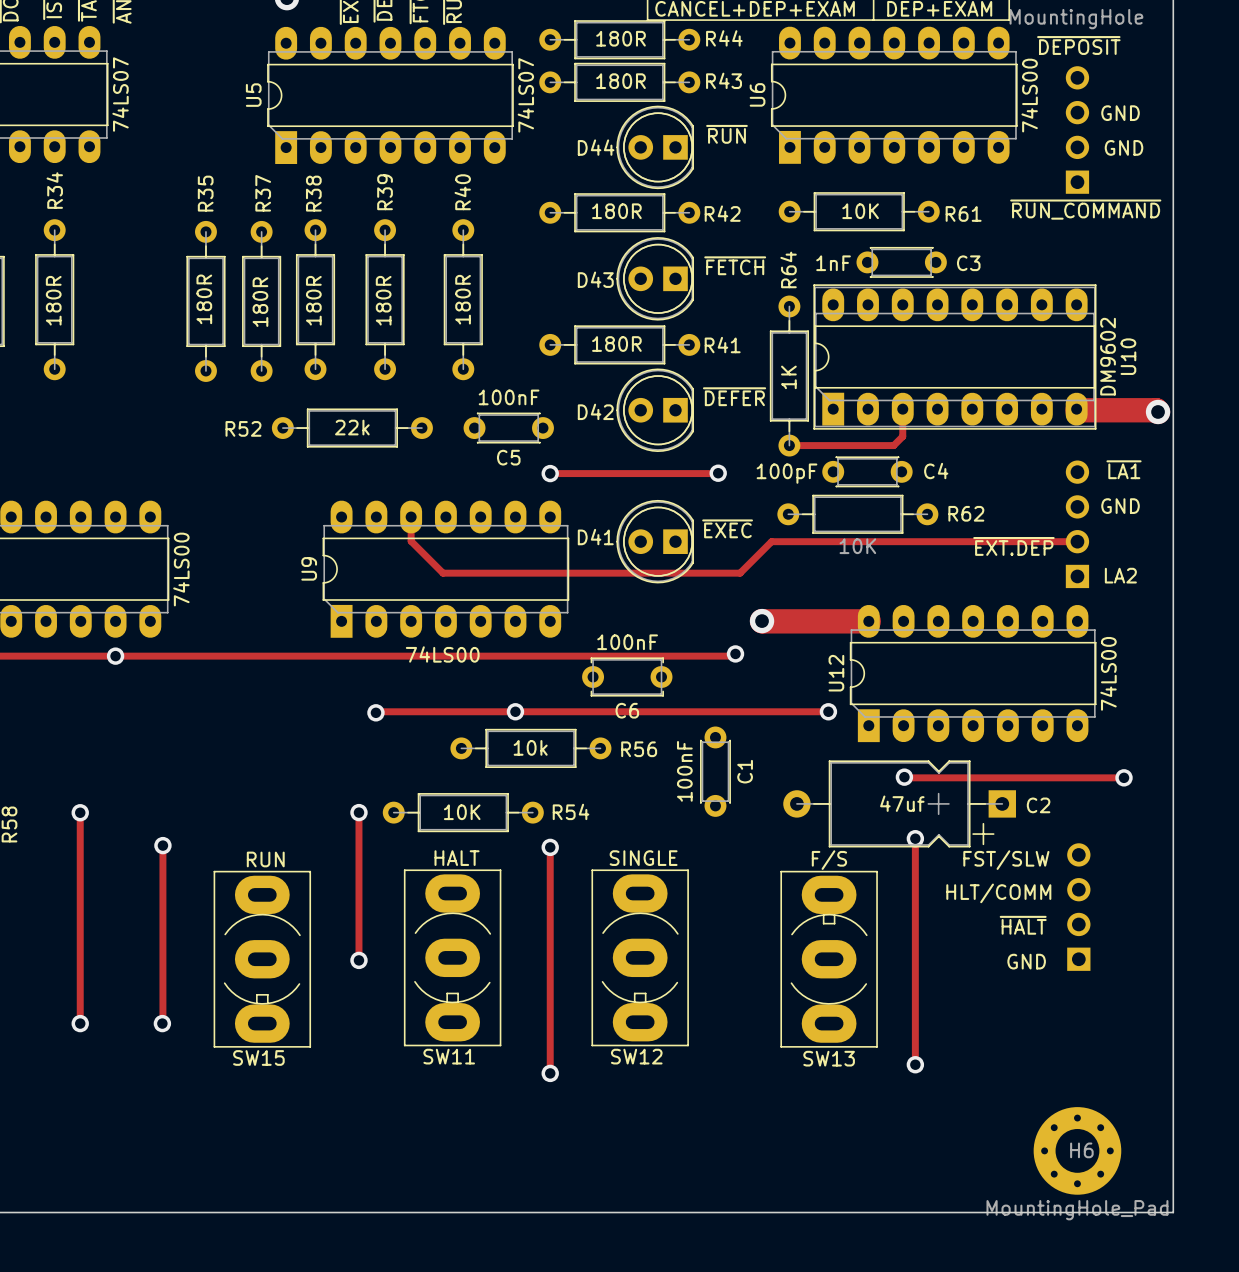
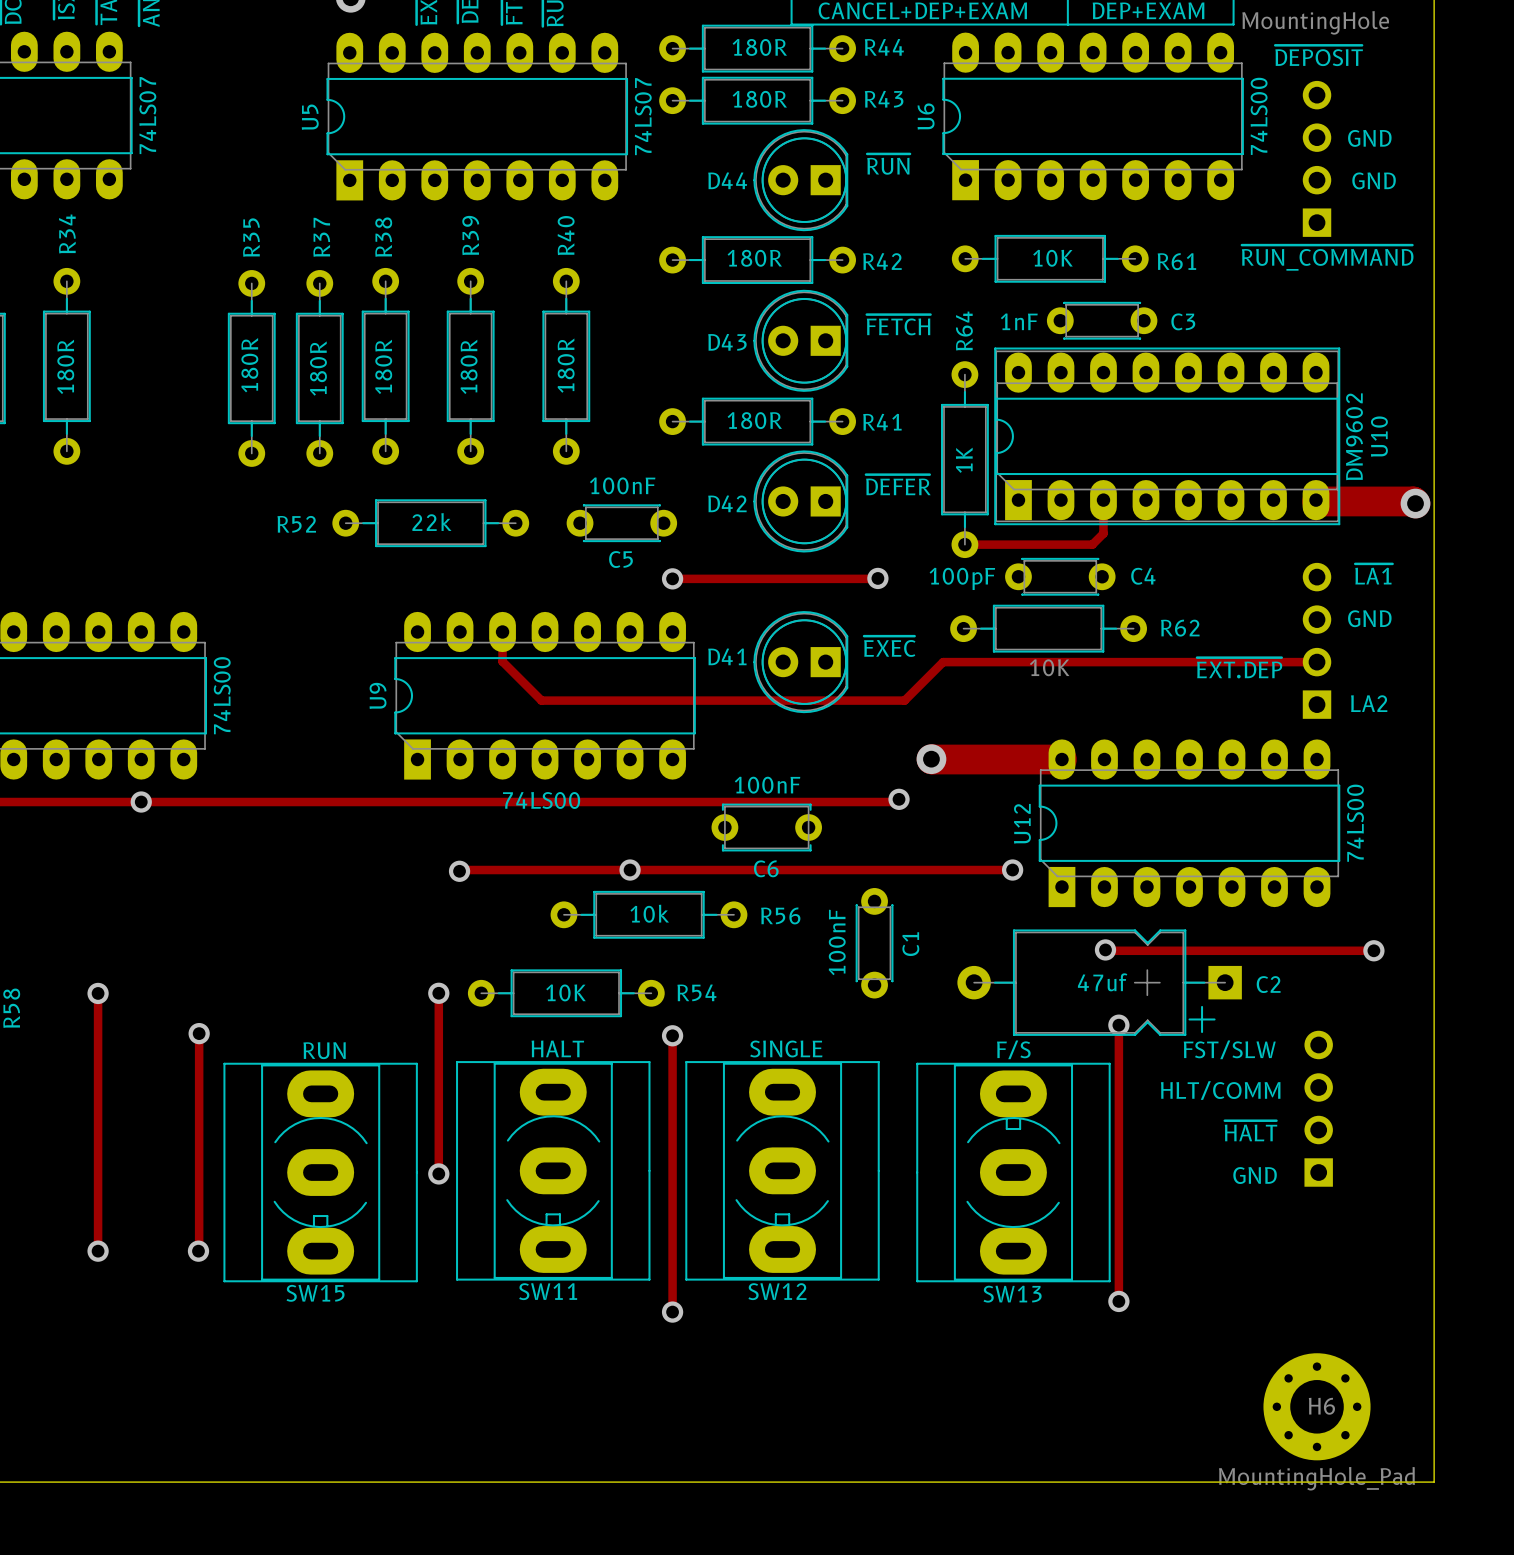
SW11 footprint: [403, 869, 502, 1047] -> [456, 1061, 651, 1281]
SW12 footprint: [591, 869, 689, 1047] -> [685, 1061, 880, 1281]
SW15 footprint: [213, 870, 312, 1048] -> [223, 1062, 418, 1283]
SW13 footprint: [780, 870, 878, 1048] -> [916, 1062, 1111, 1283]

